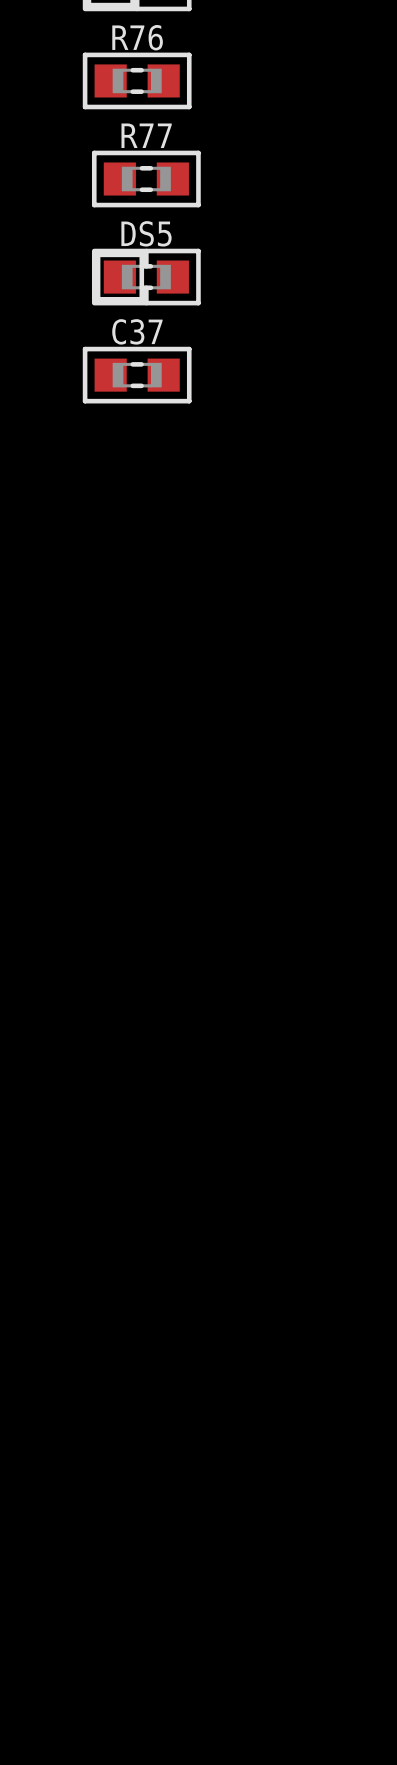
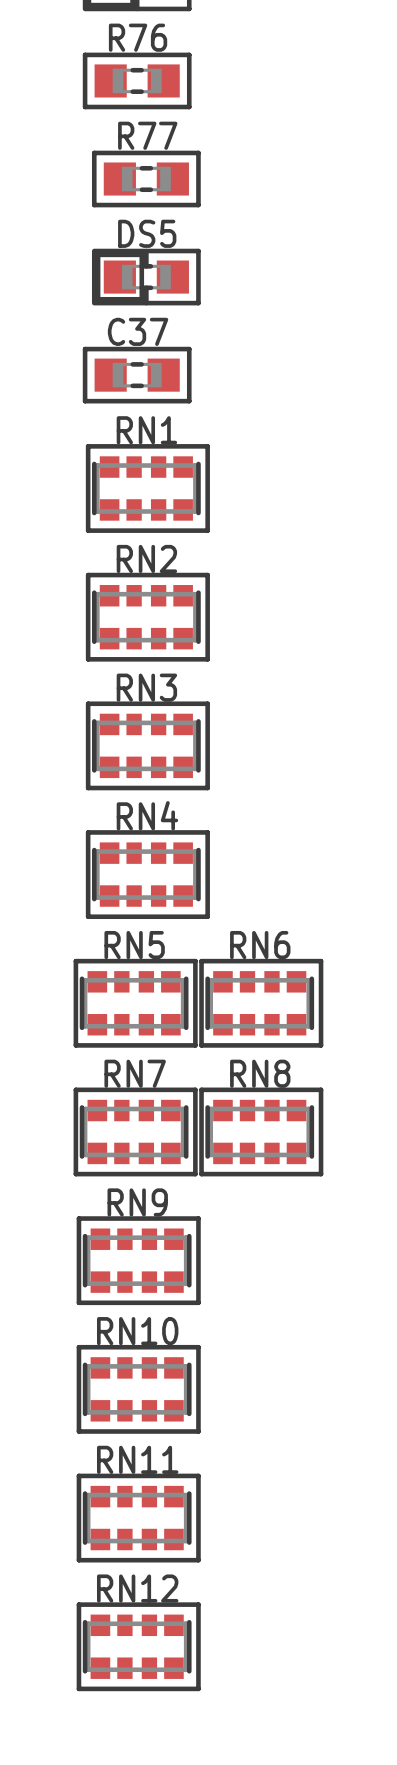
RN1: none -> (147, 488)
RN2: none -> (147, 617)
RN3: none -> (147, 745)
RN4: none -> (147, 874)
RN5: none -> (135, 1003)
RN6: none -> (261, 1003)
RN7: none -> (135, 1131)
RN8: none -> (261, 1131)
RN9: none -> (138, 1260)
RN10: none -> (138, 1389)
RN11: none -> (138, 1518)
RN12: none -> (138, 1646)

